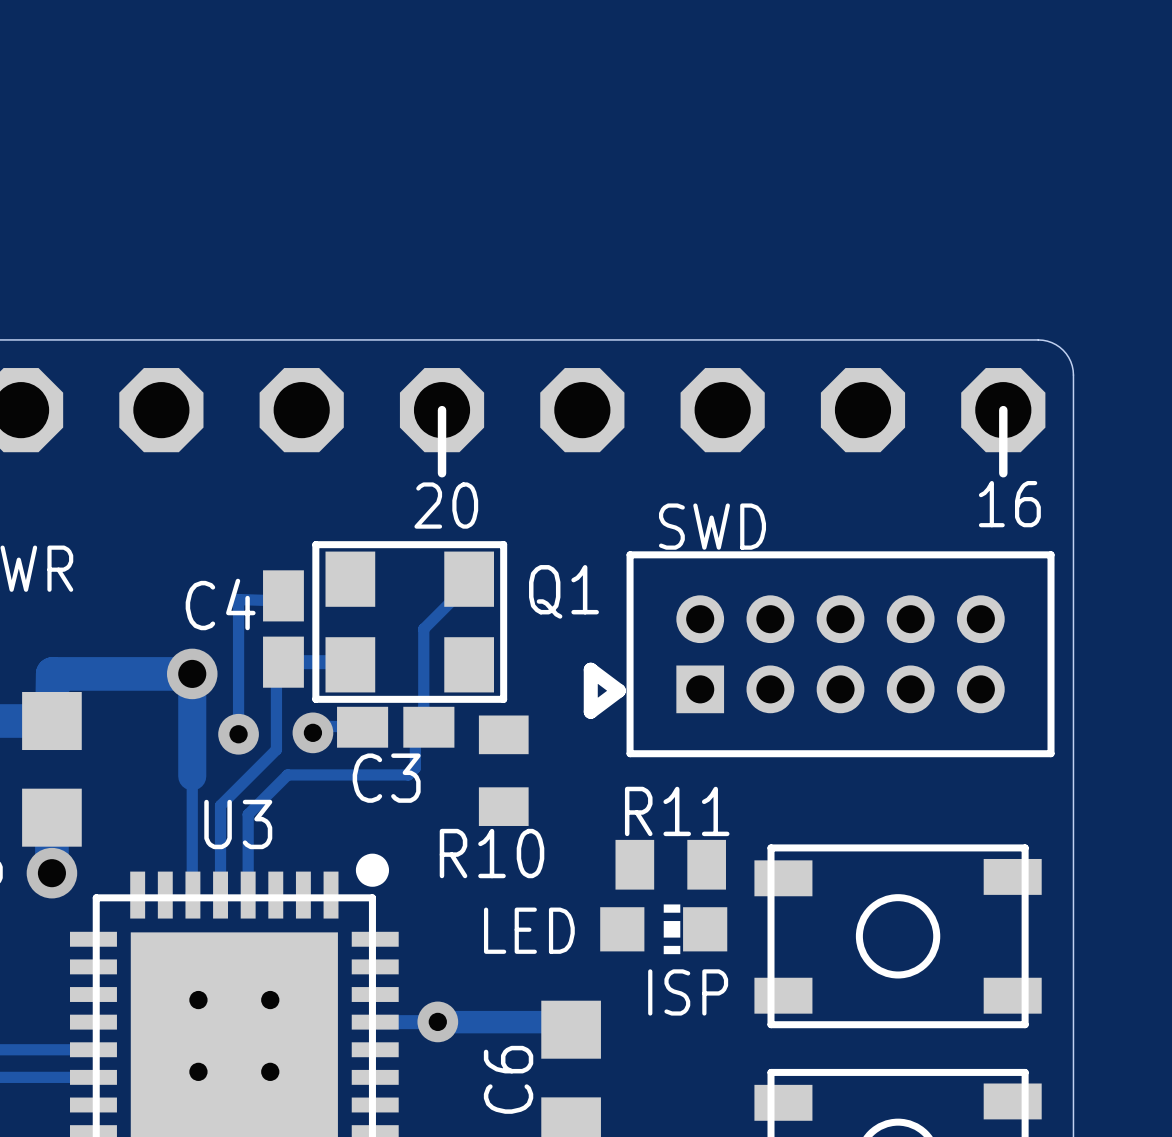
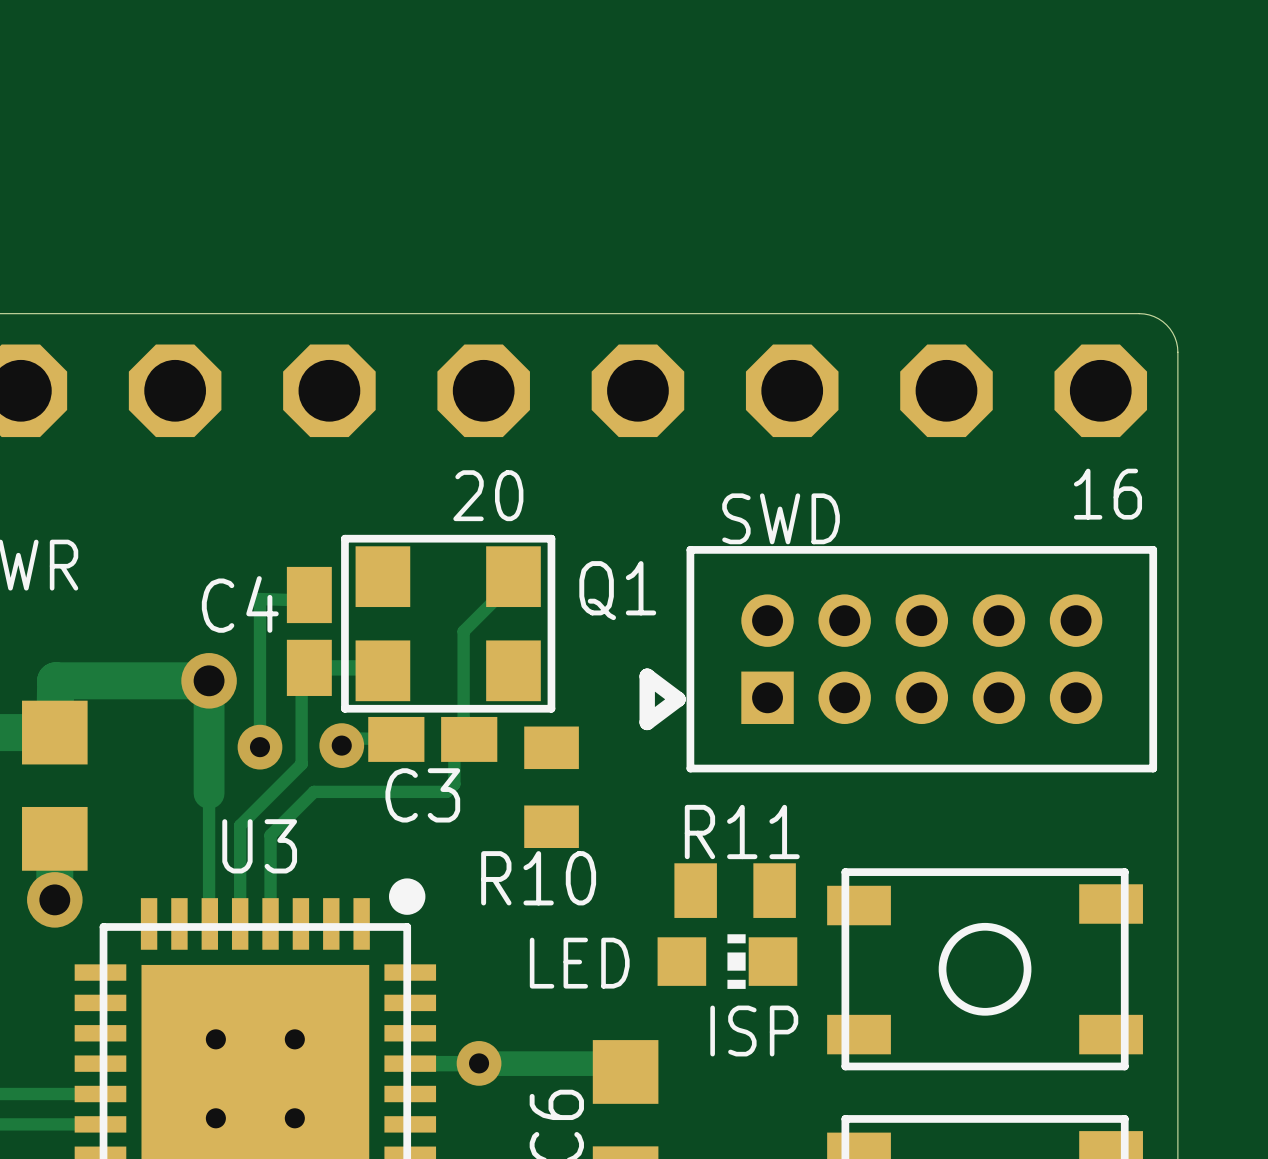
line: (442, 410) (442, 473) -> none
line: (1003, 410) (1003, 473) -> none

